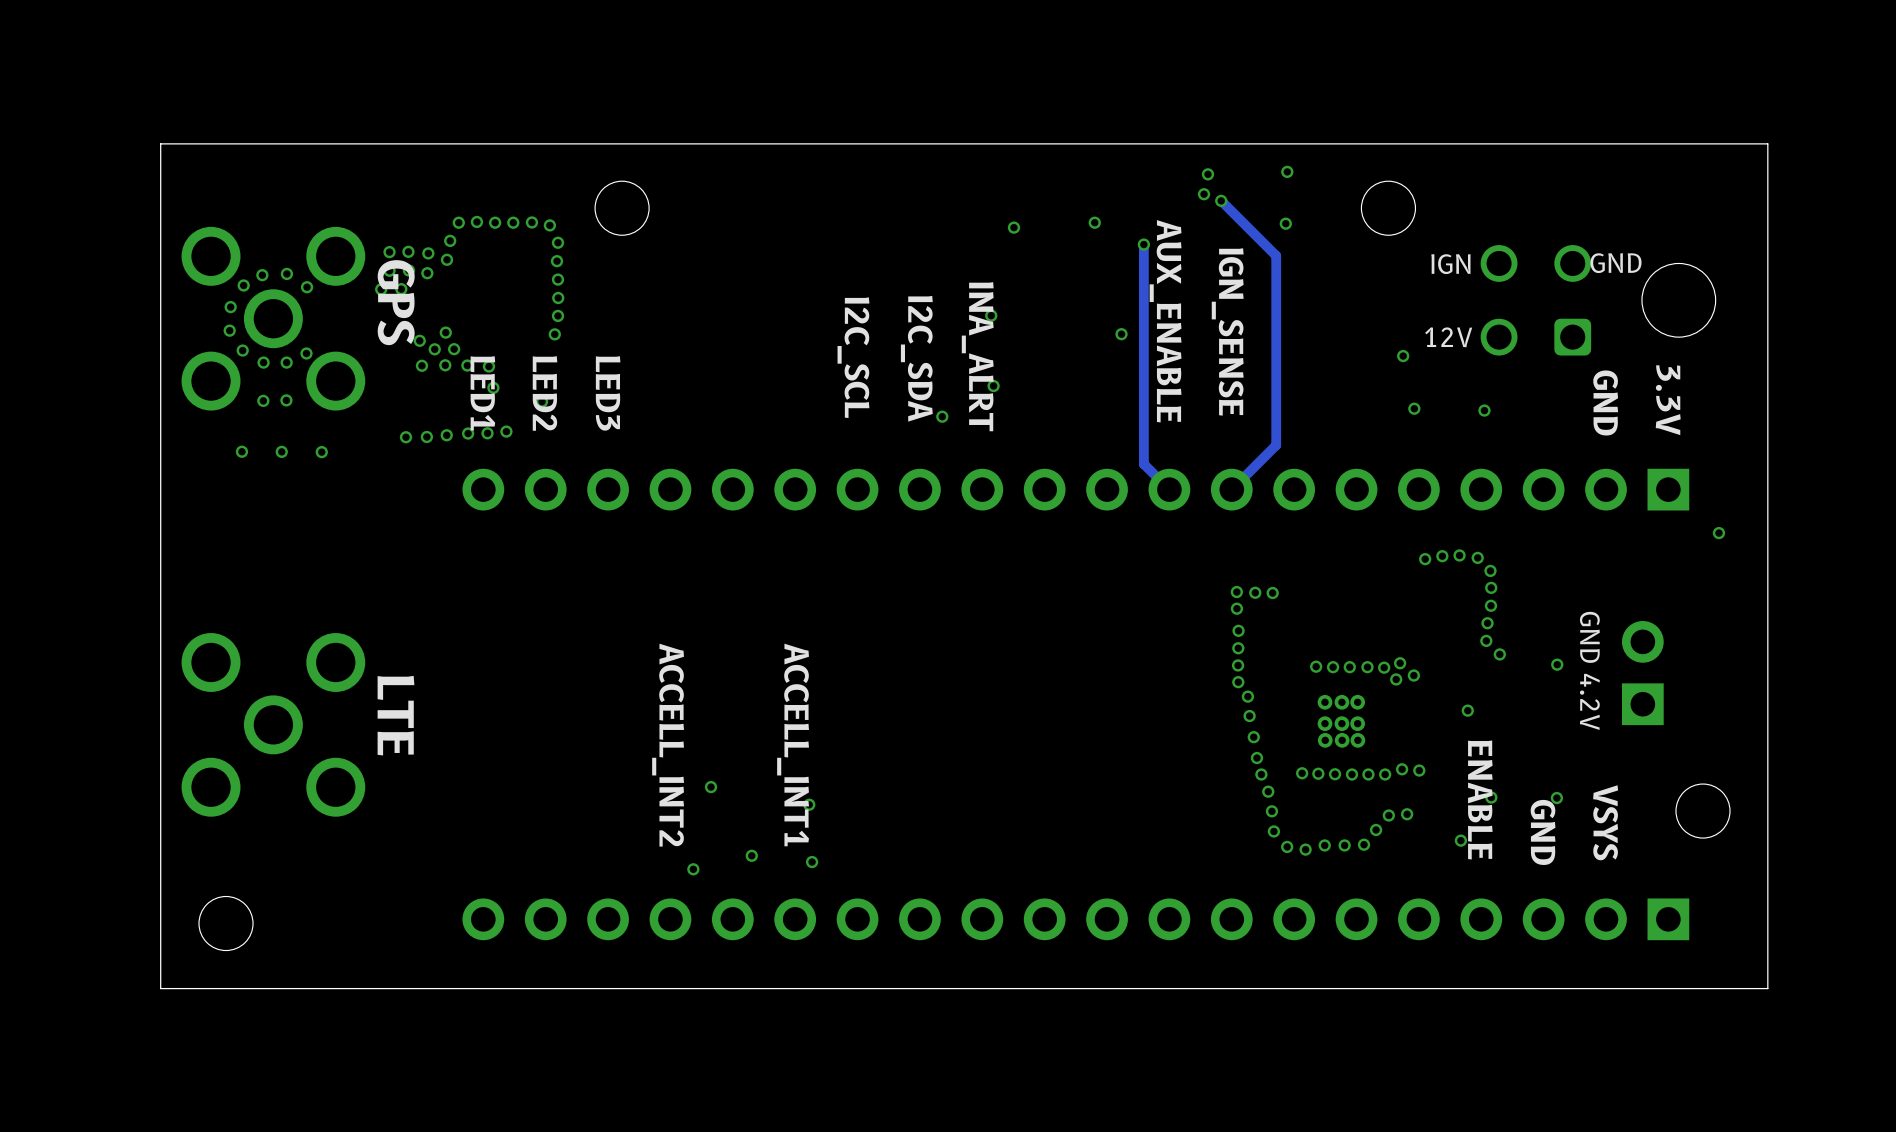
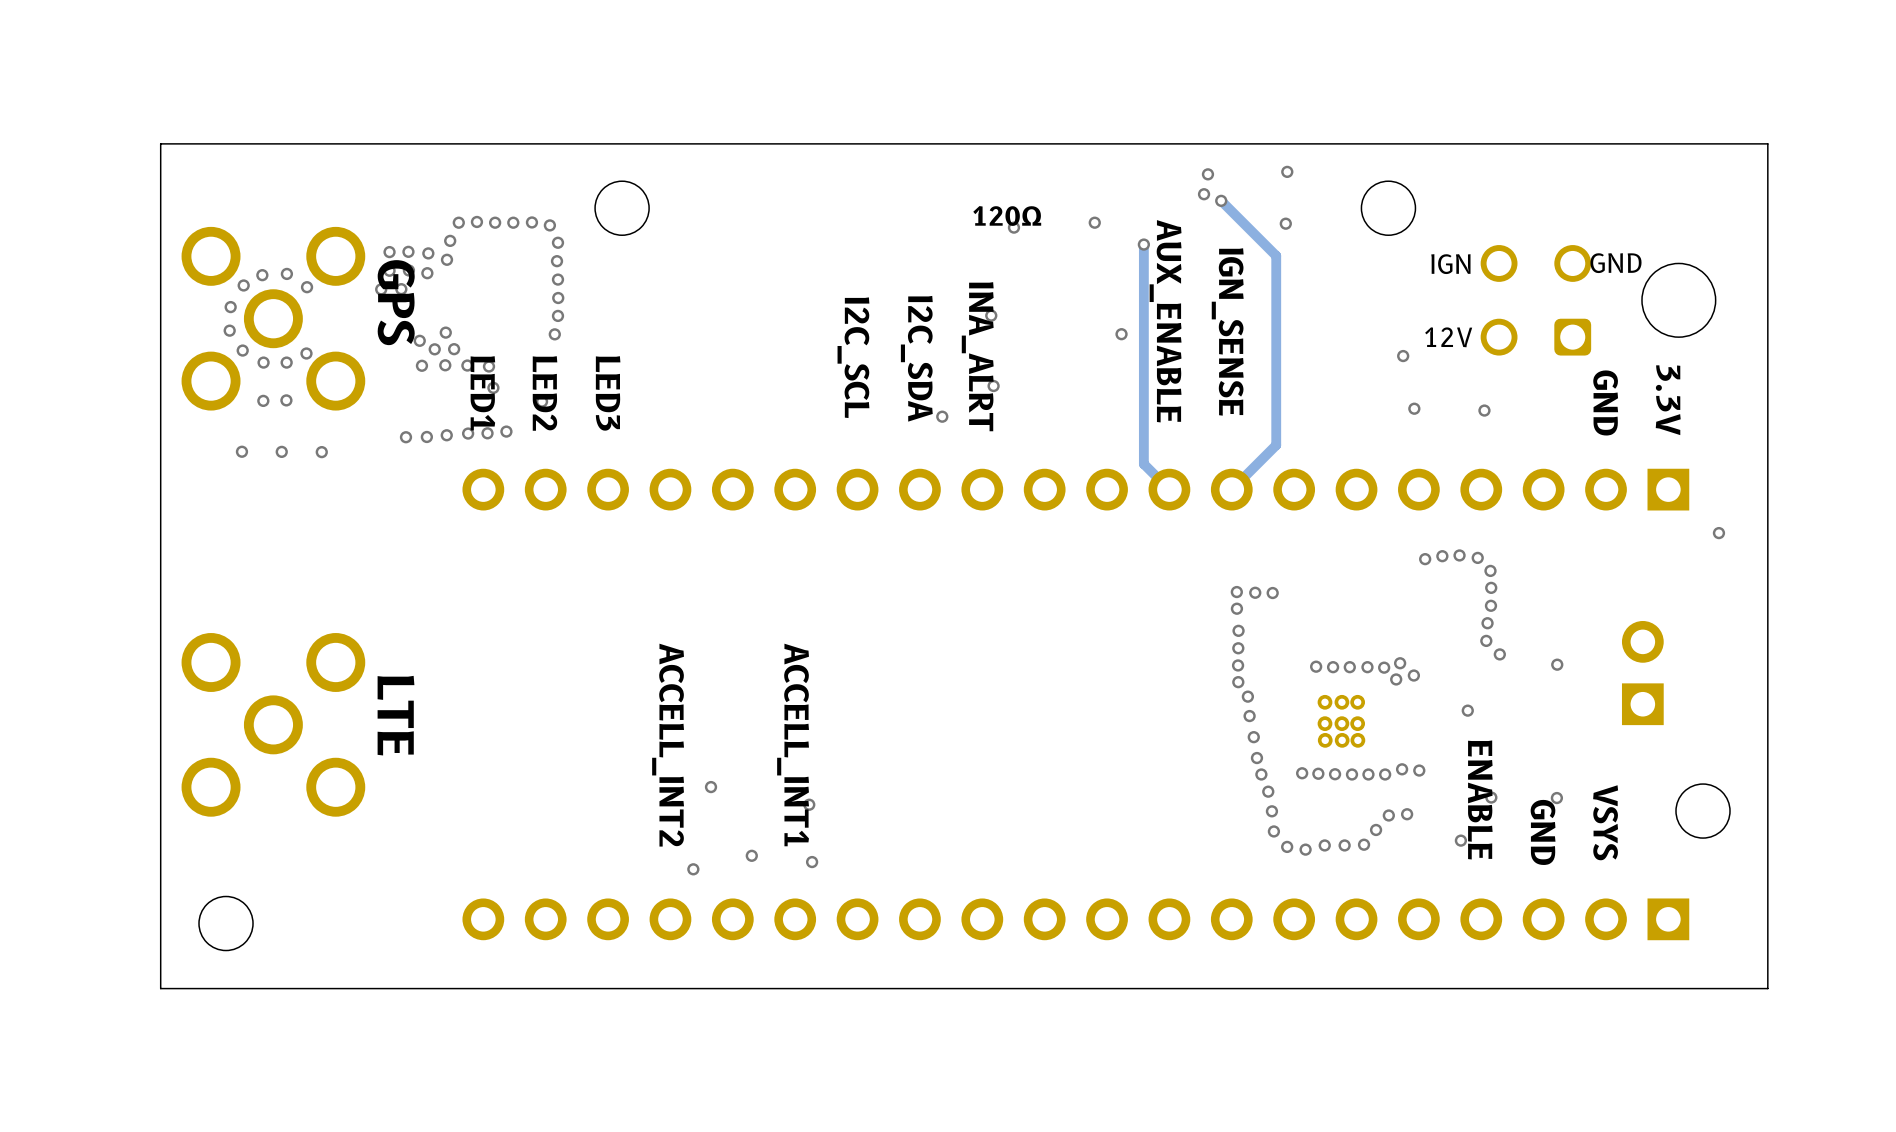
text: none -> 120Ω (1007, 216)
text: GND (1589, 637) -> none
text: 4.2V (1589, 701) -> none

